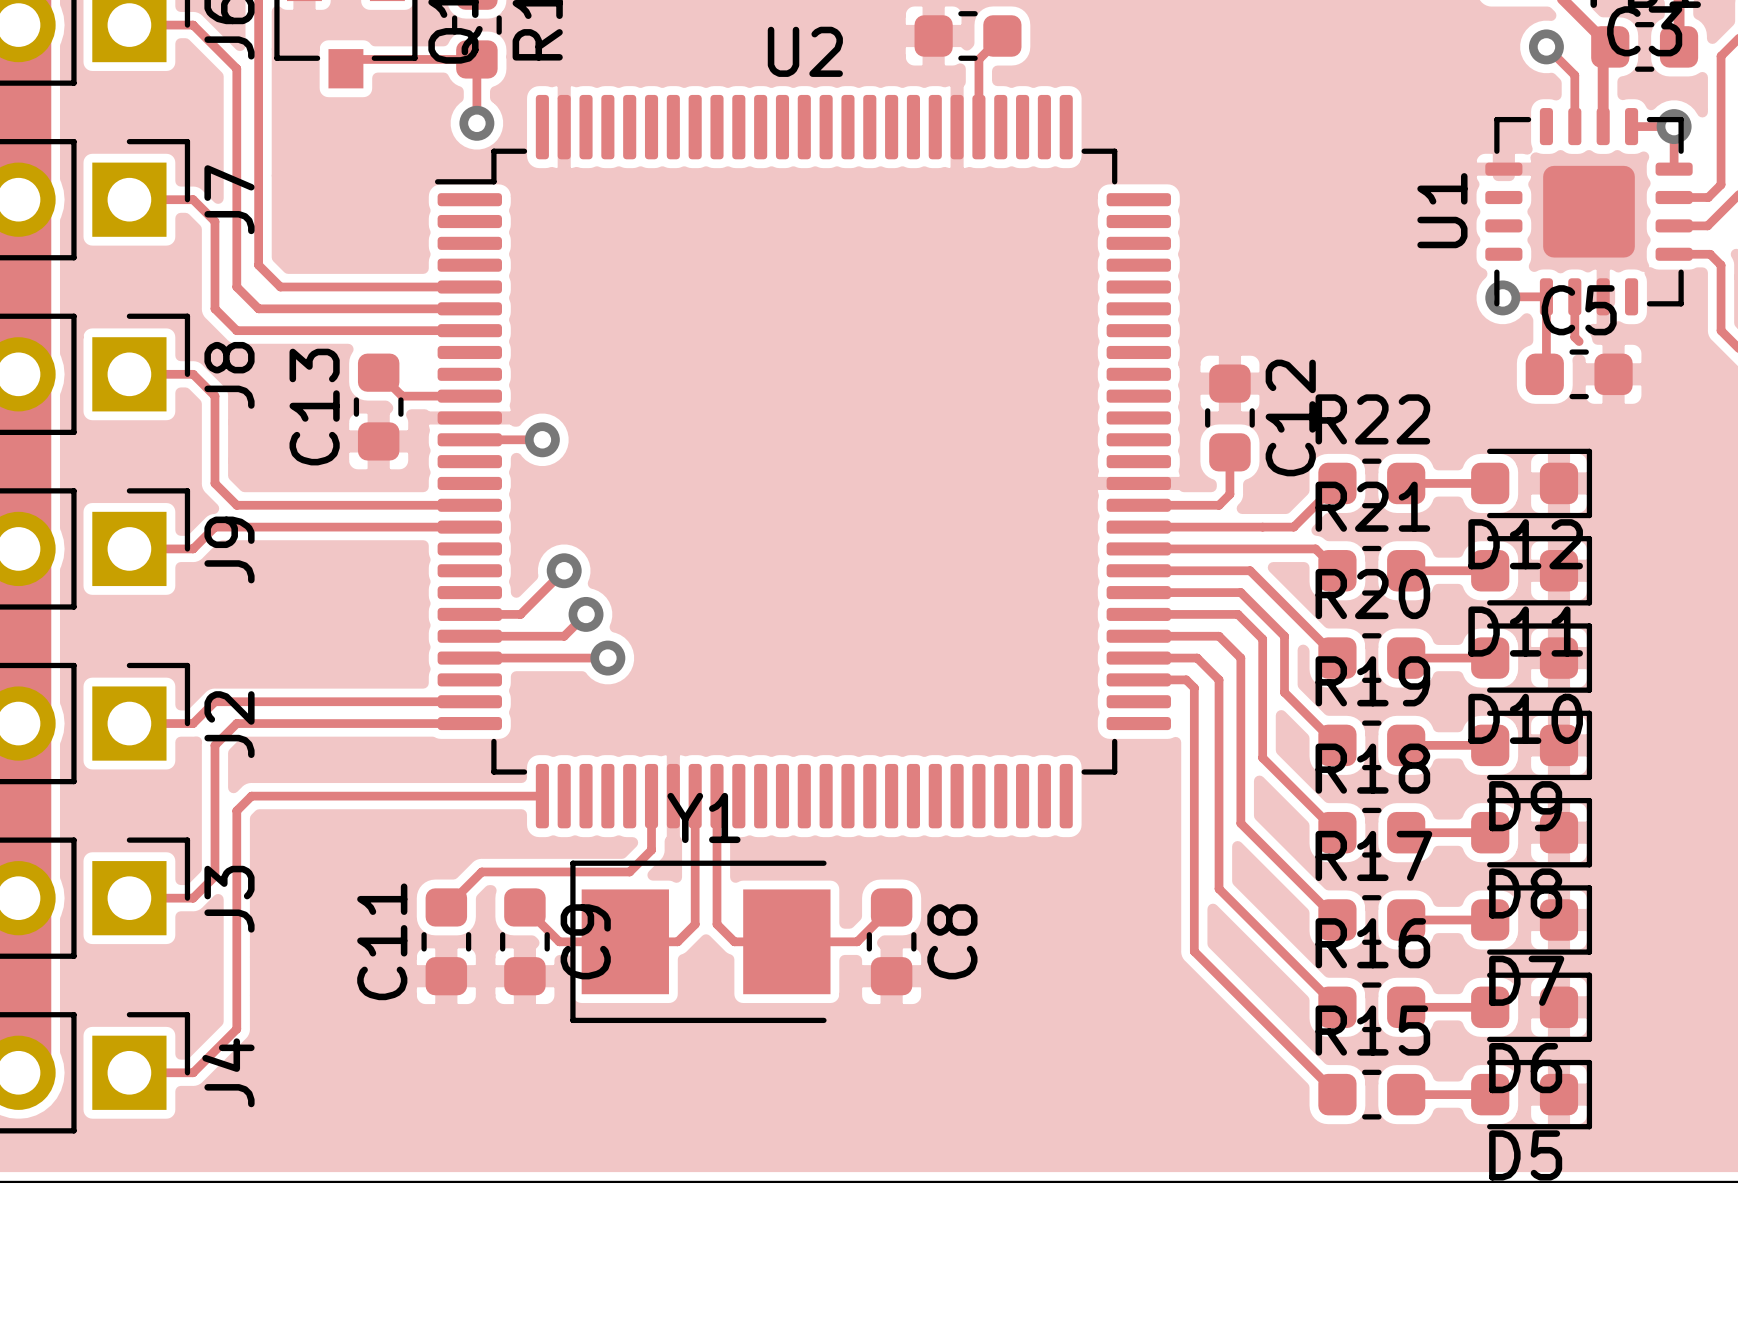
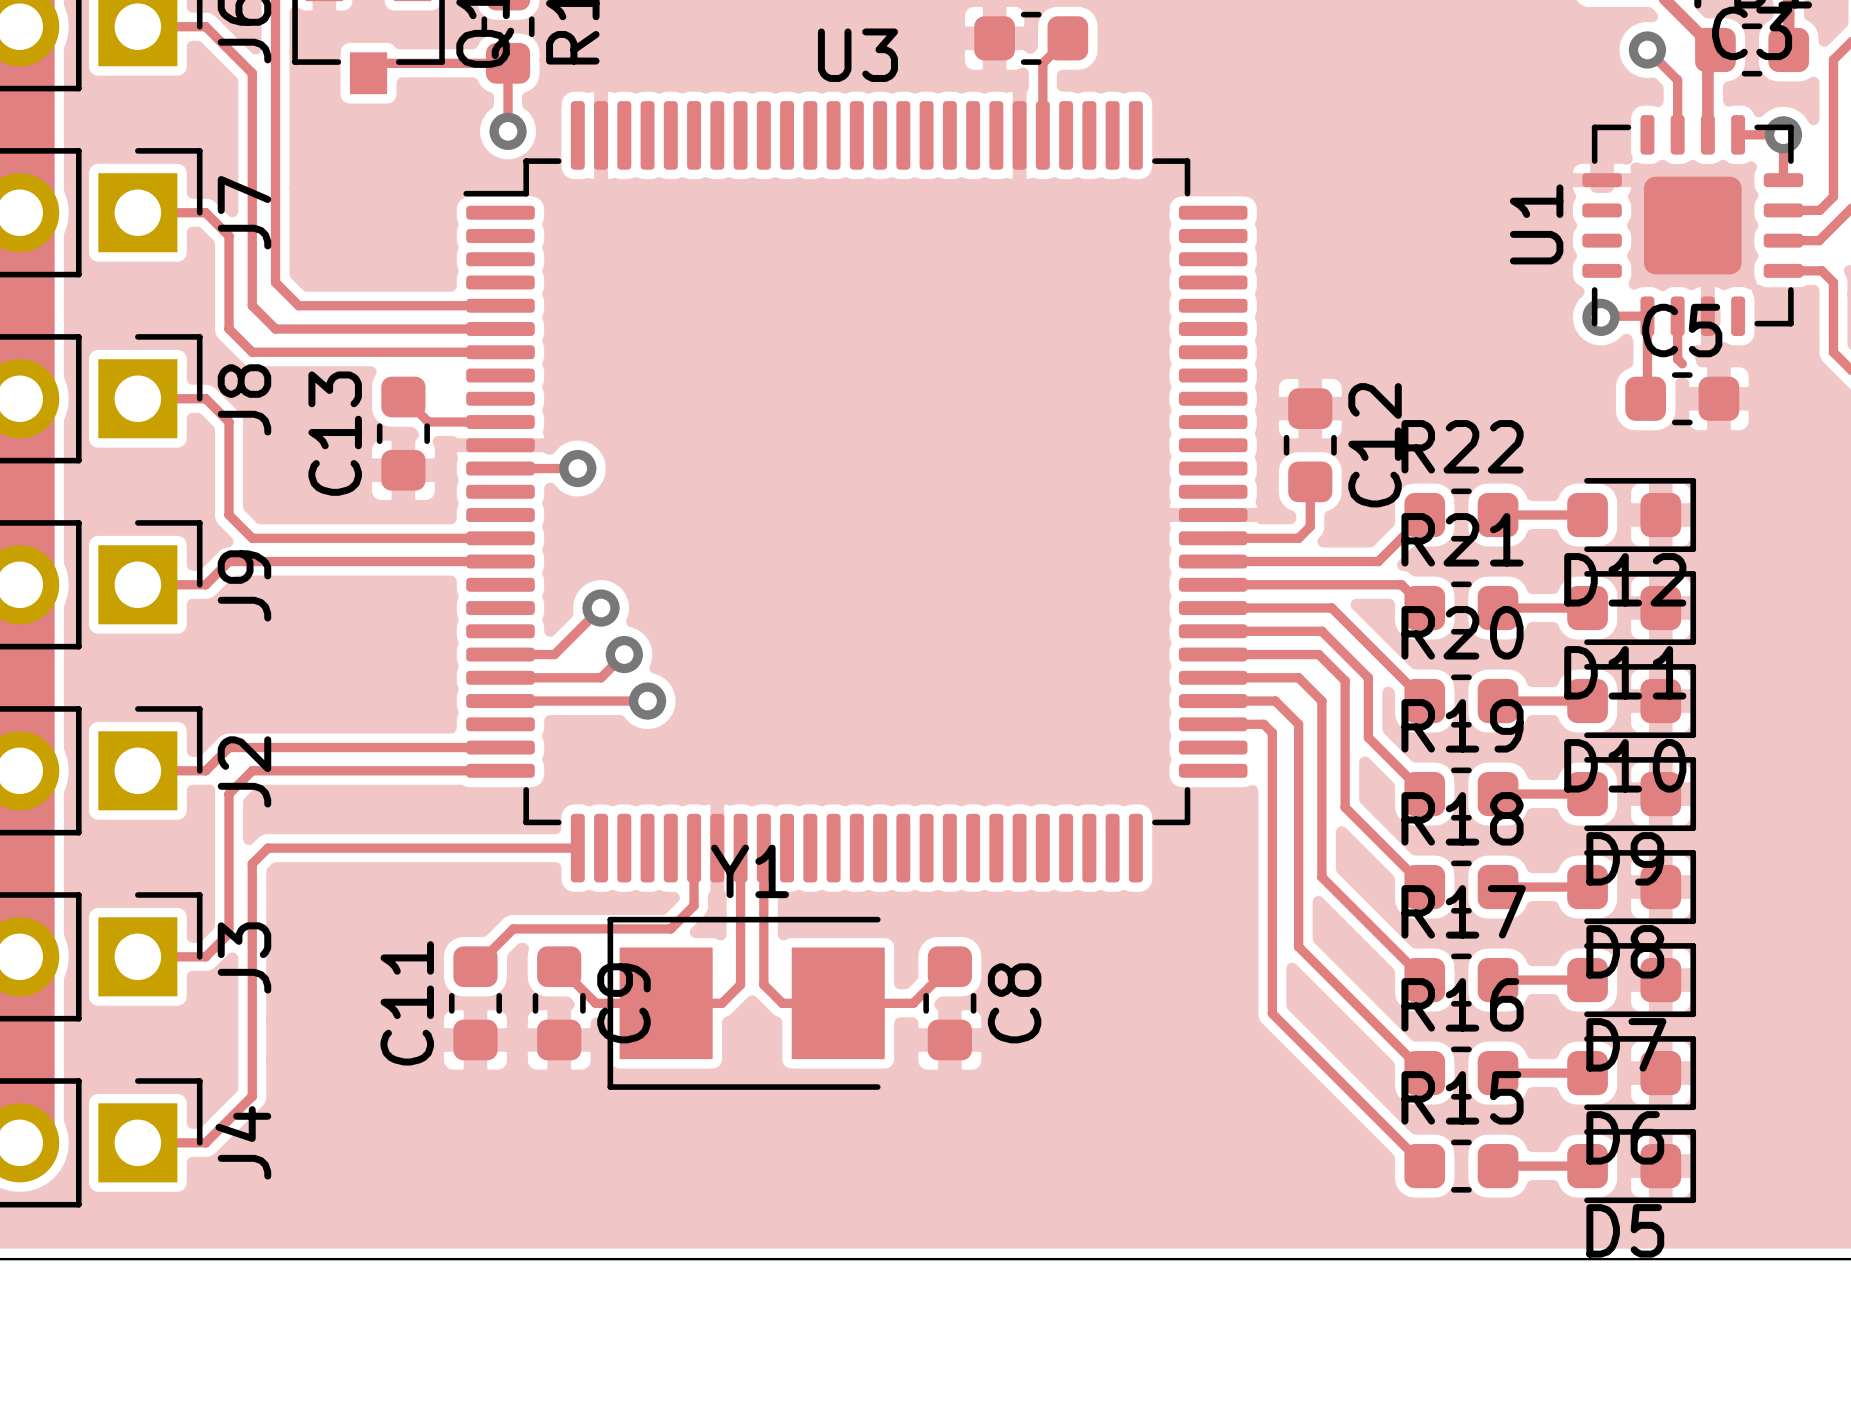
U2 name: U2 (805, 51) -> U3 (857, 55)

